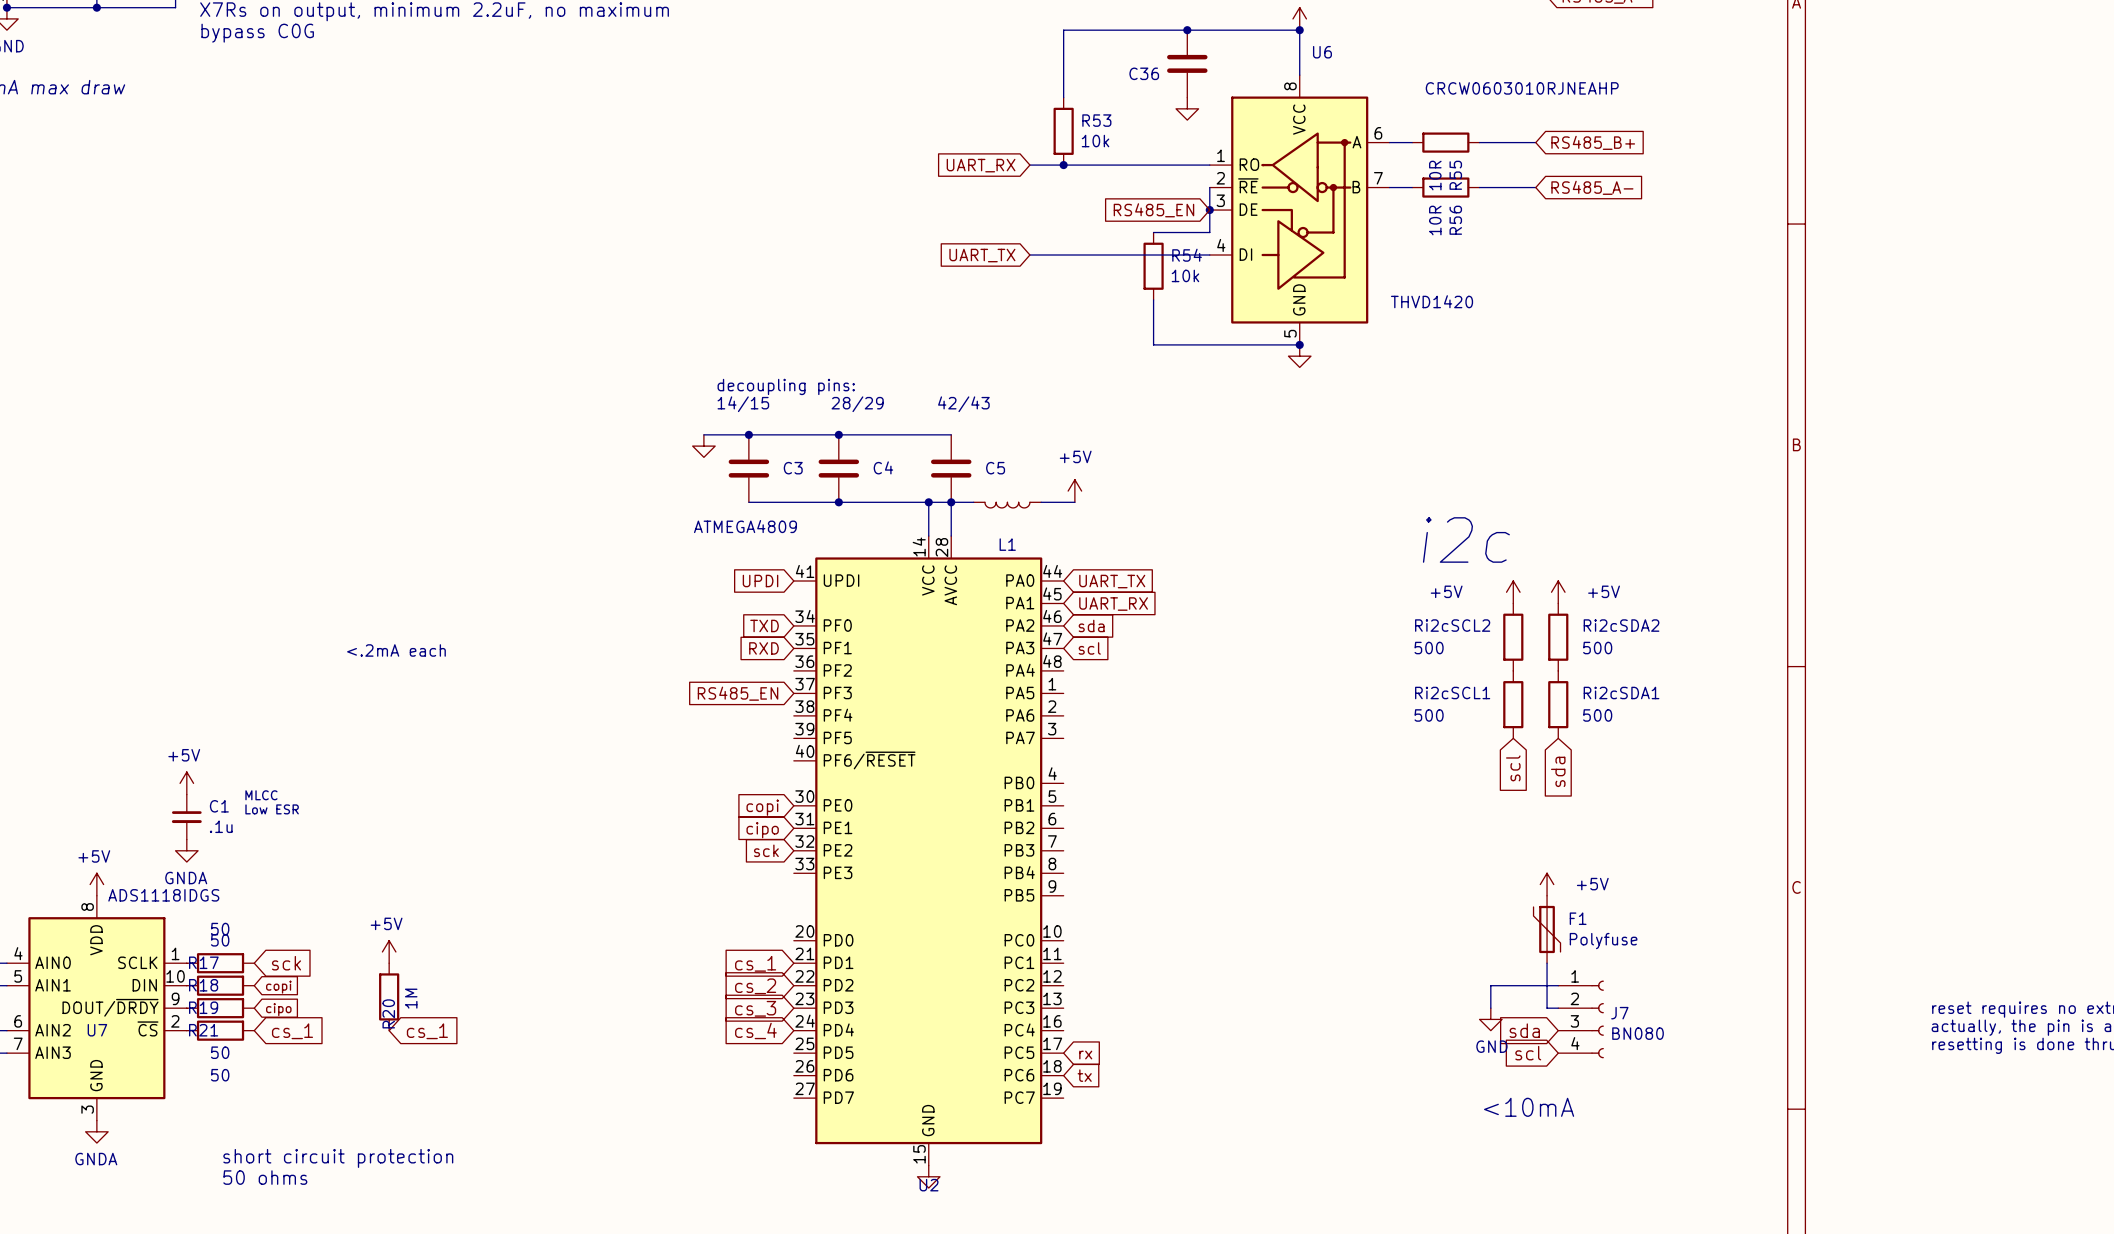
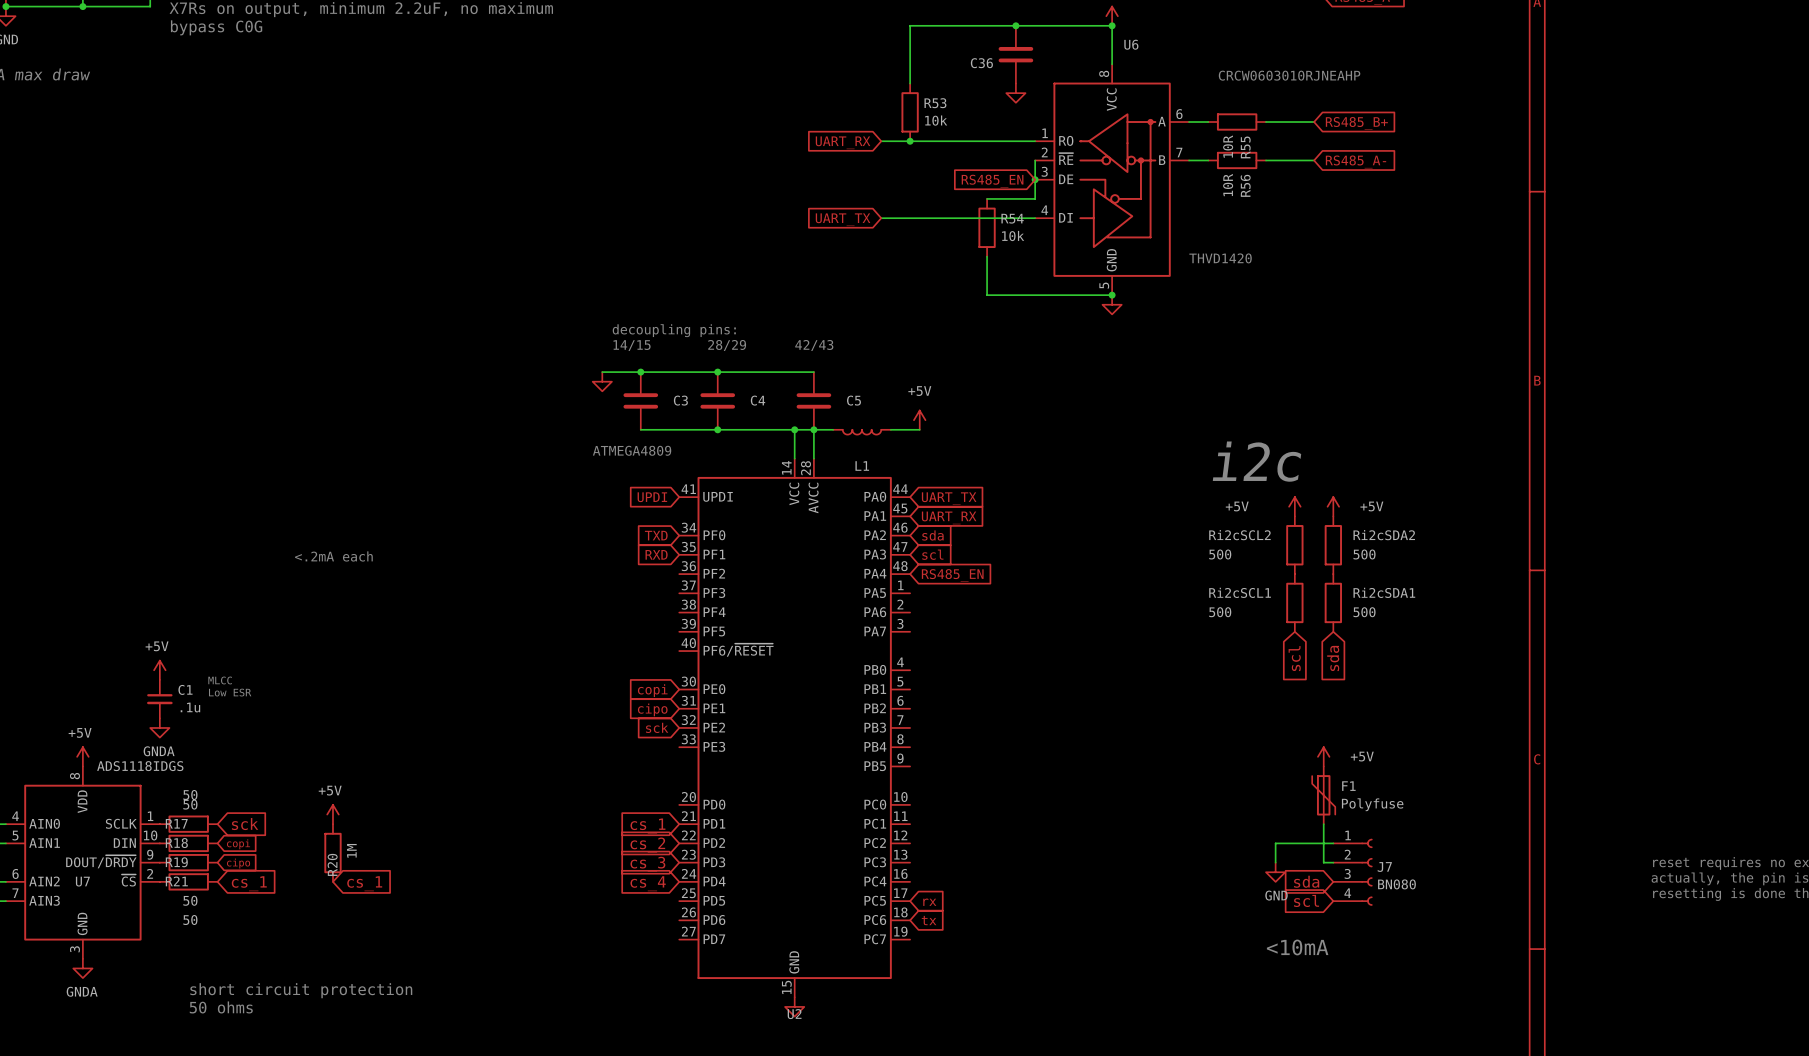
global label: none -> RS485_EN (952, 575)
global label: RS485_EN (738, 693) -> none

